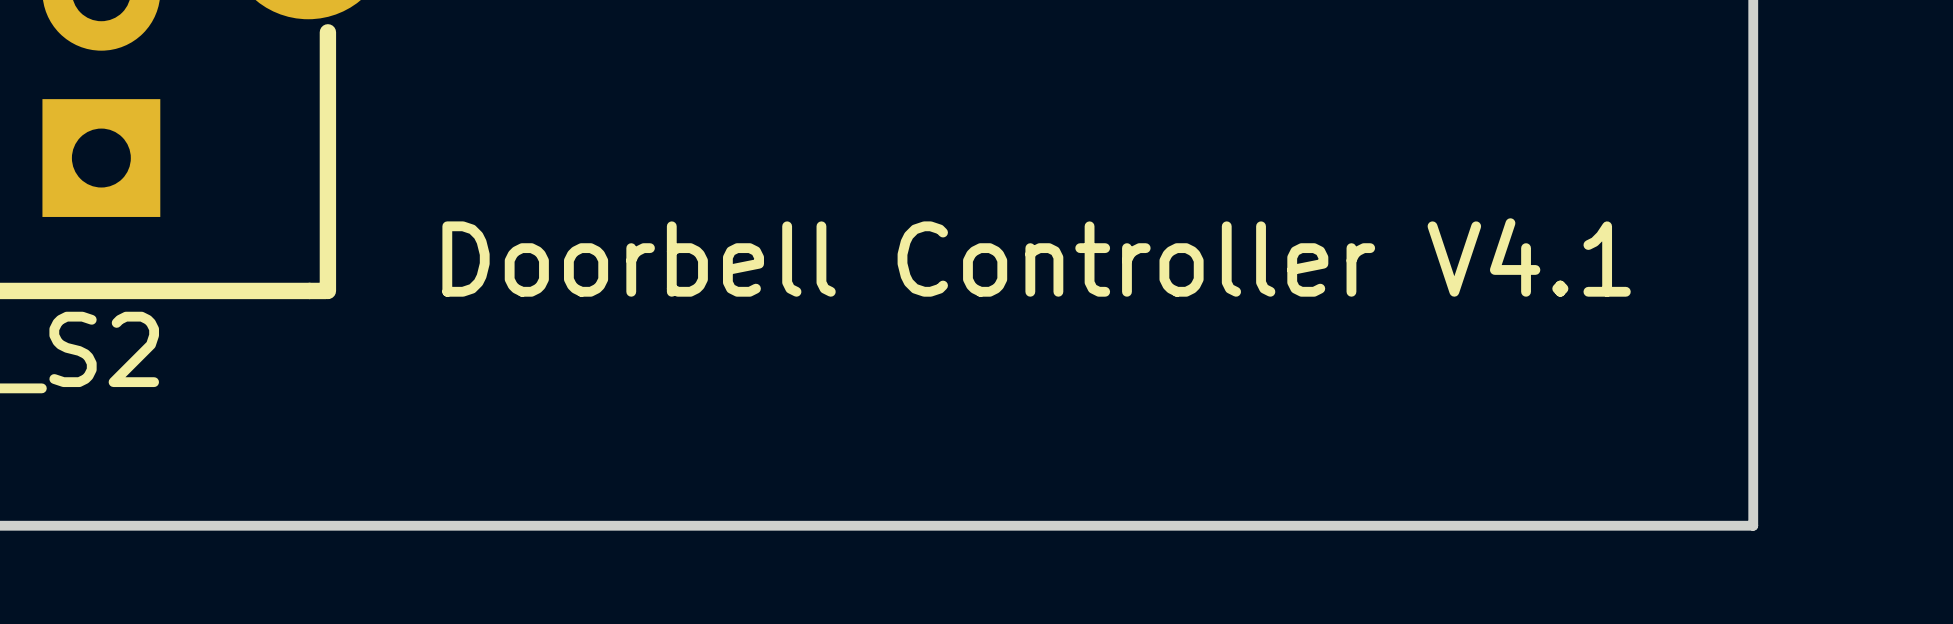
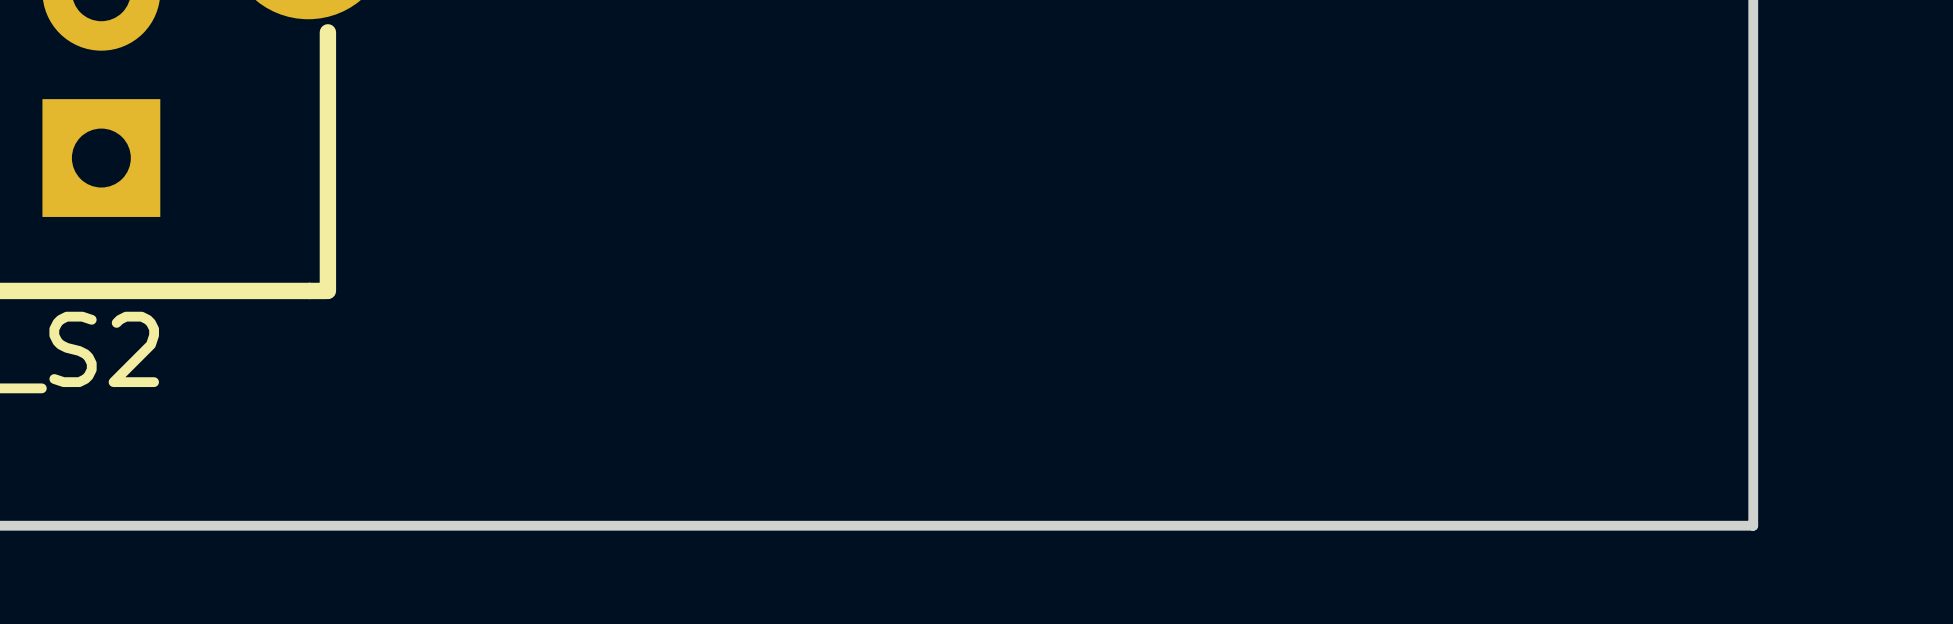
text: Doorbell Controller V4.1 (1036, 257) -> none

